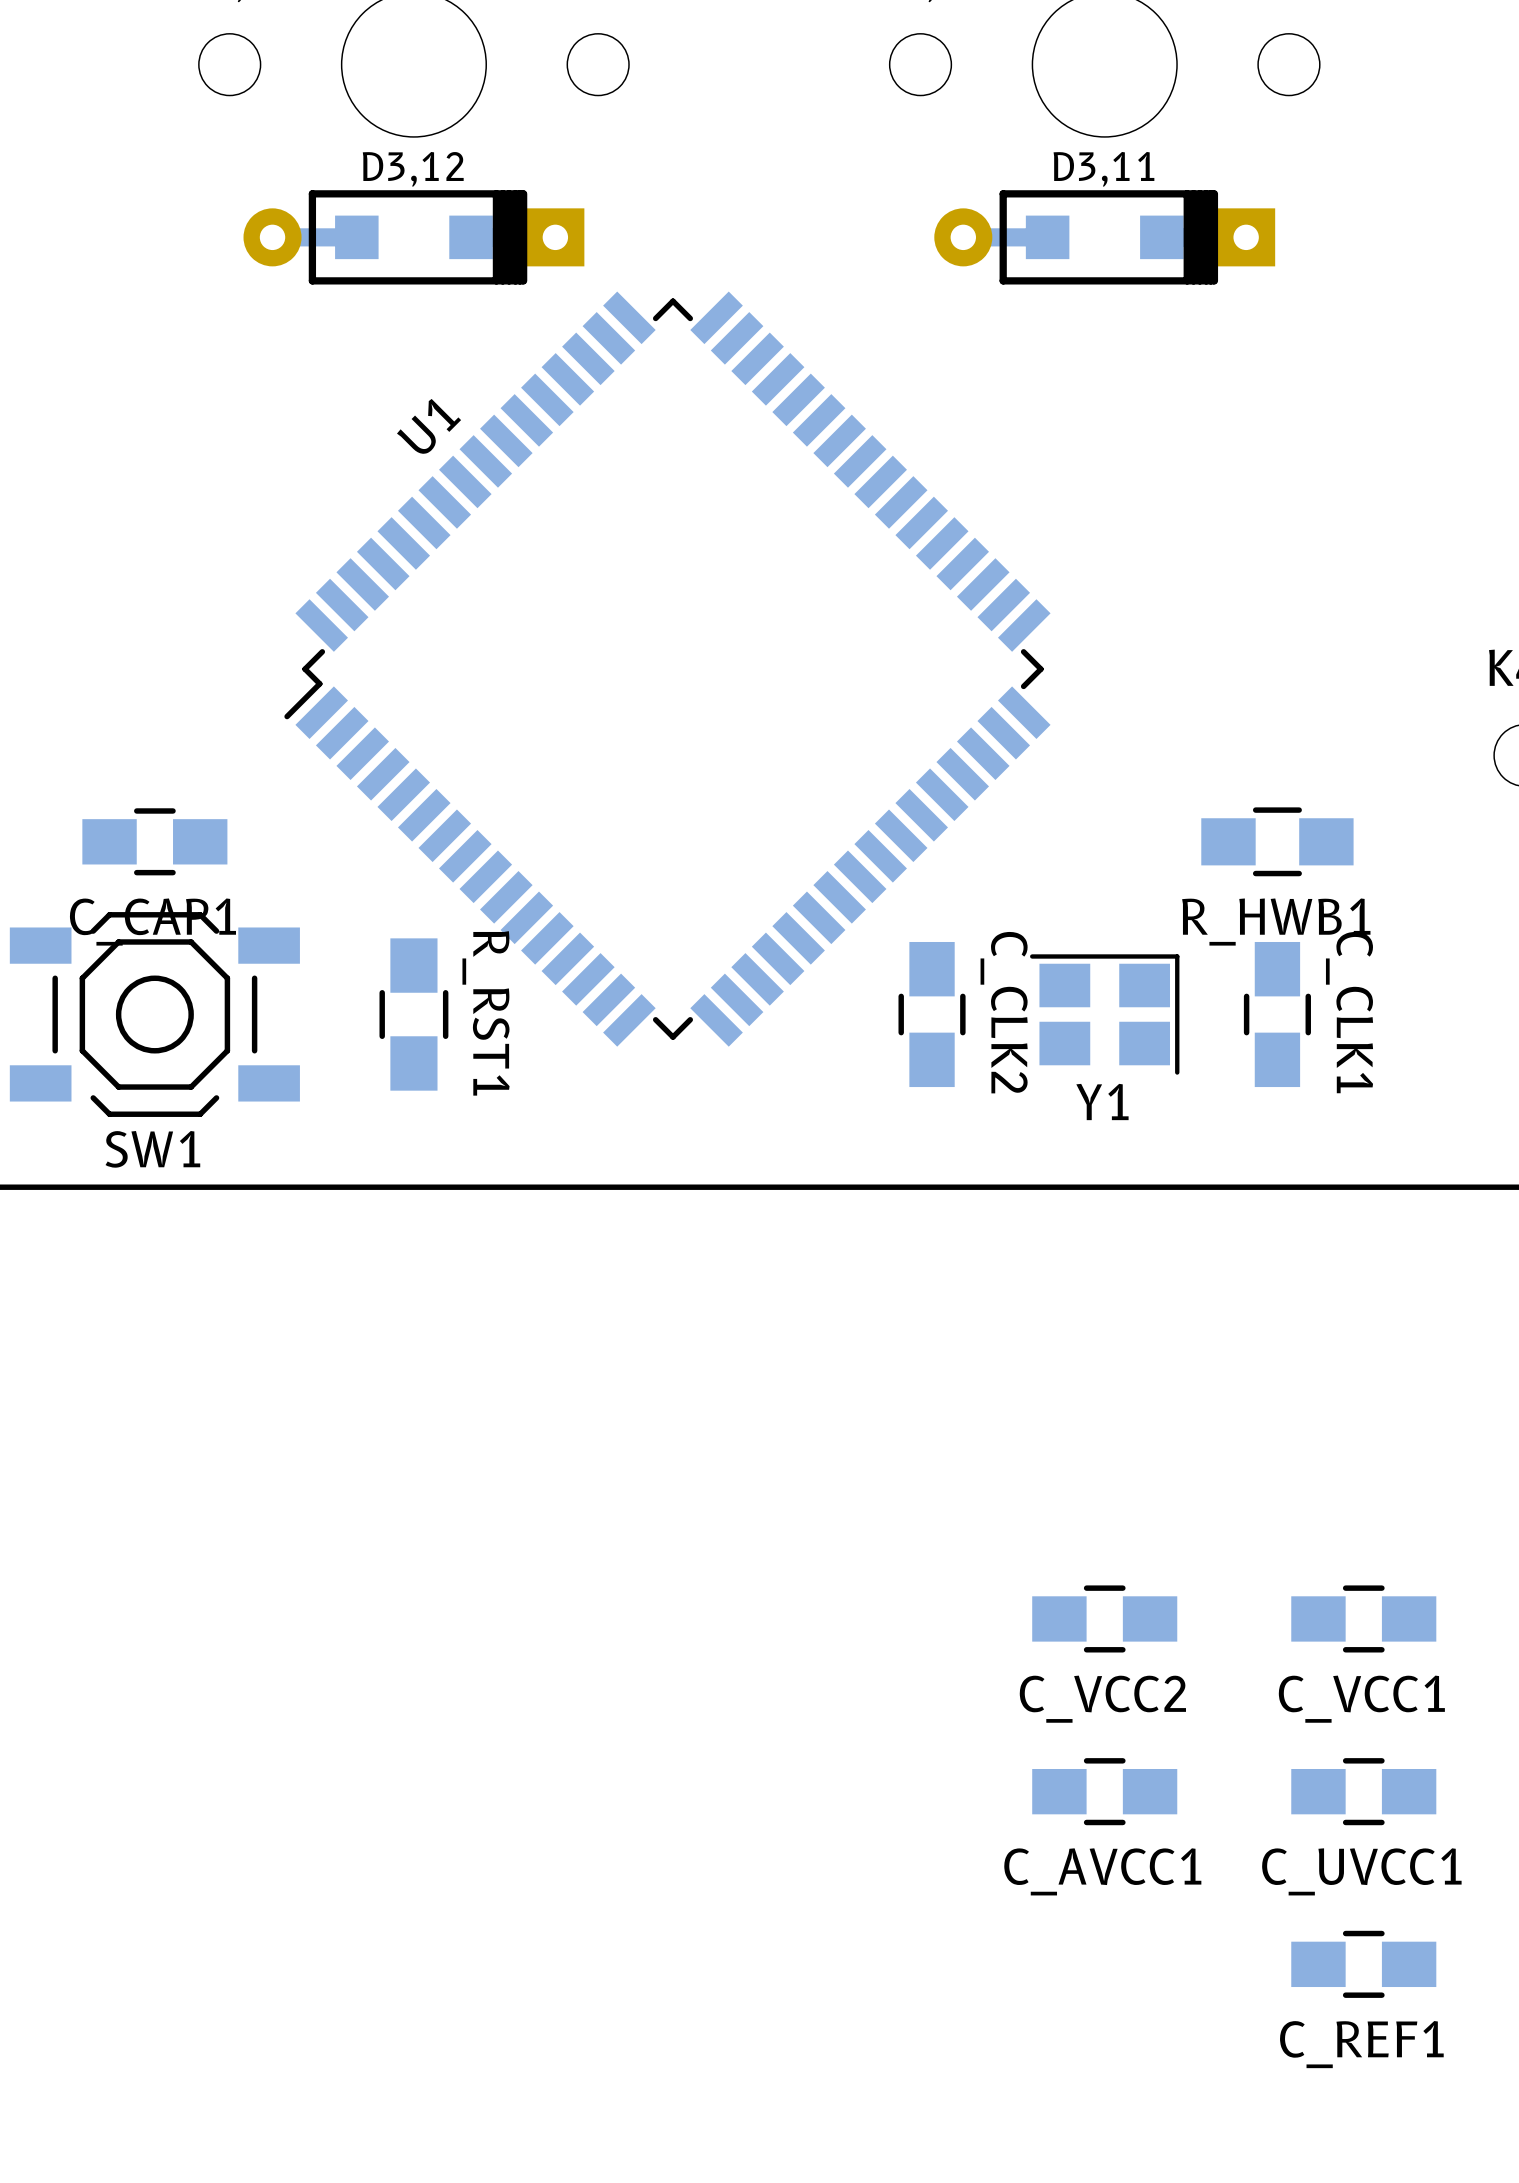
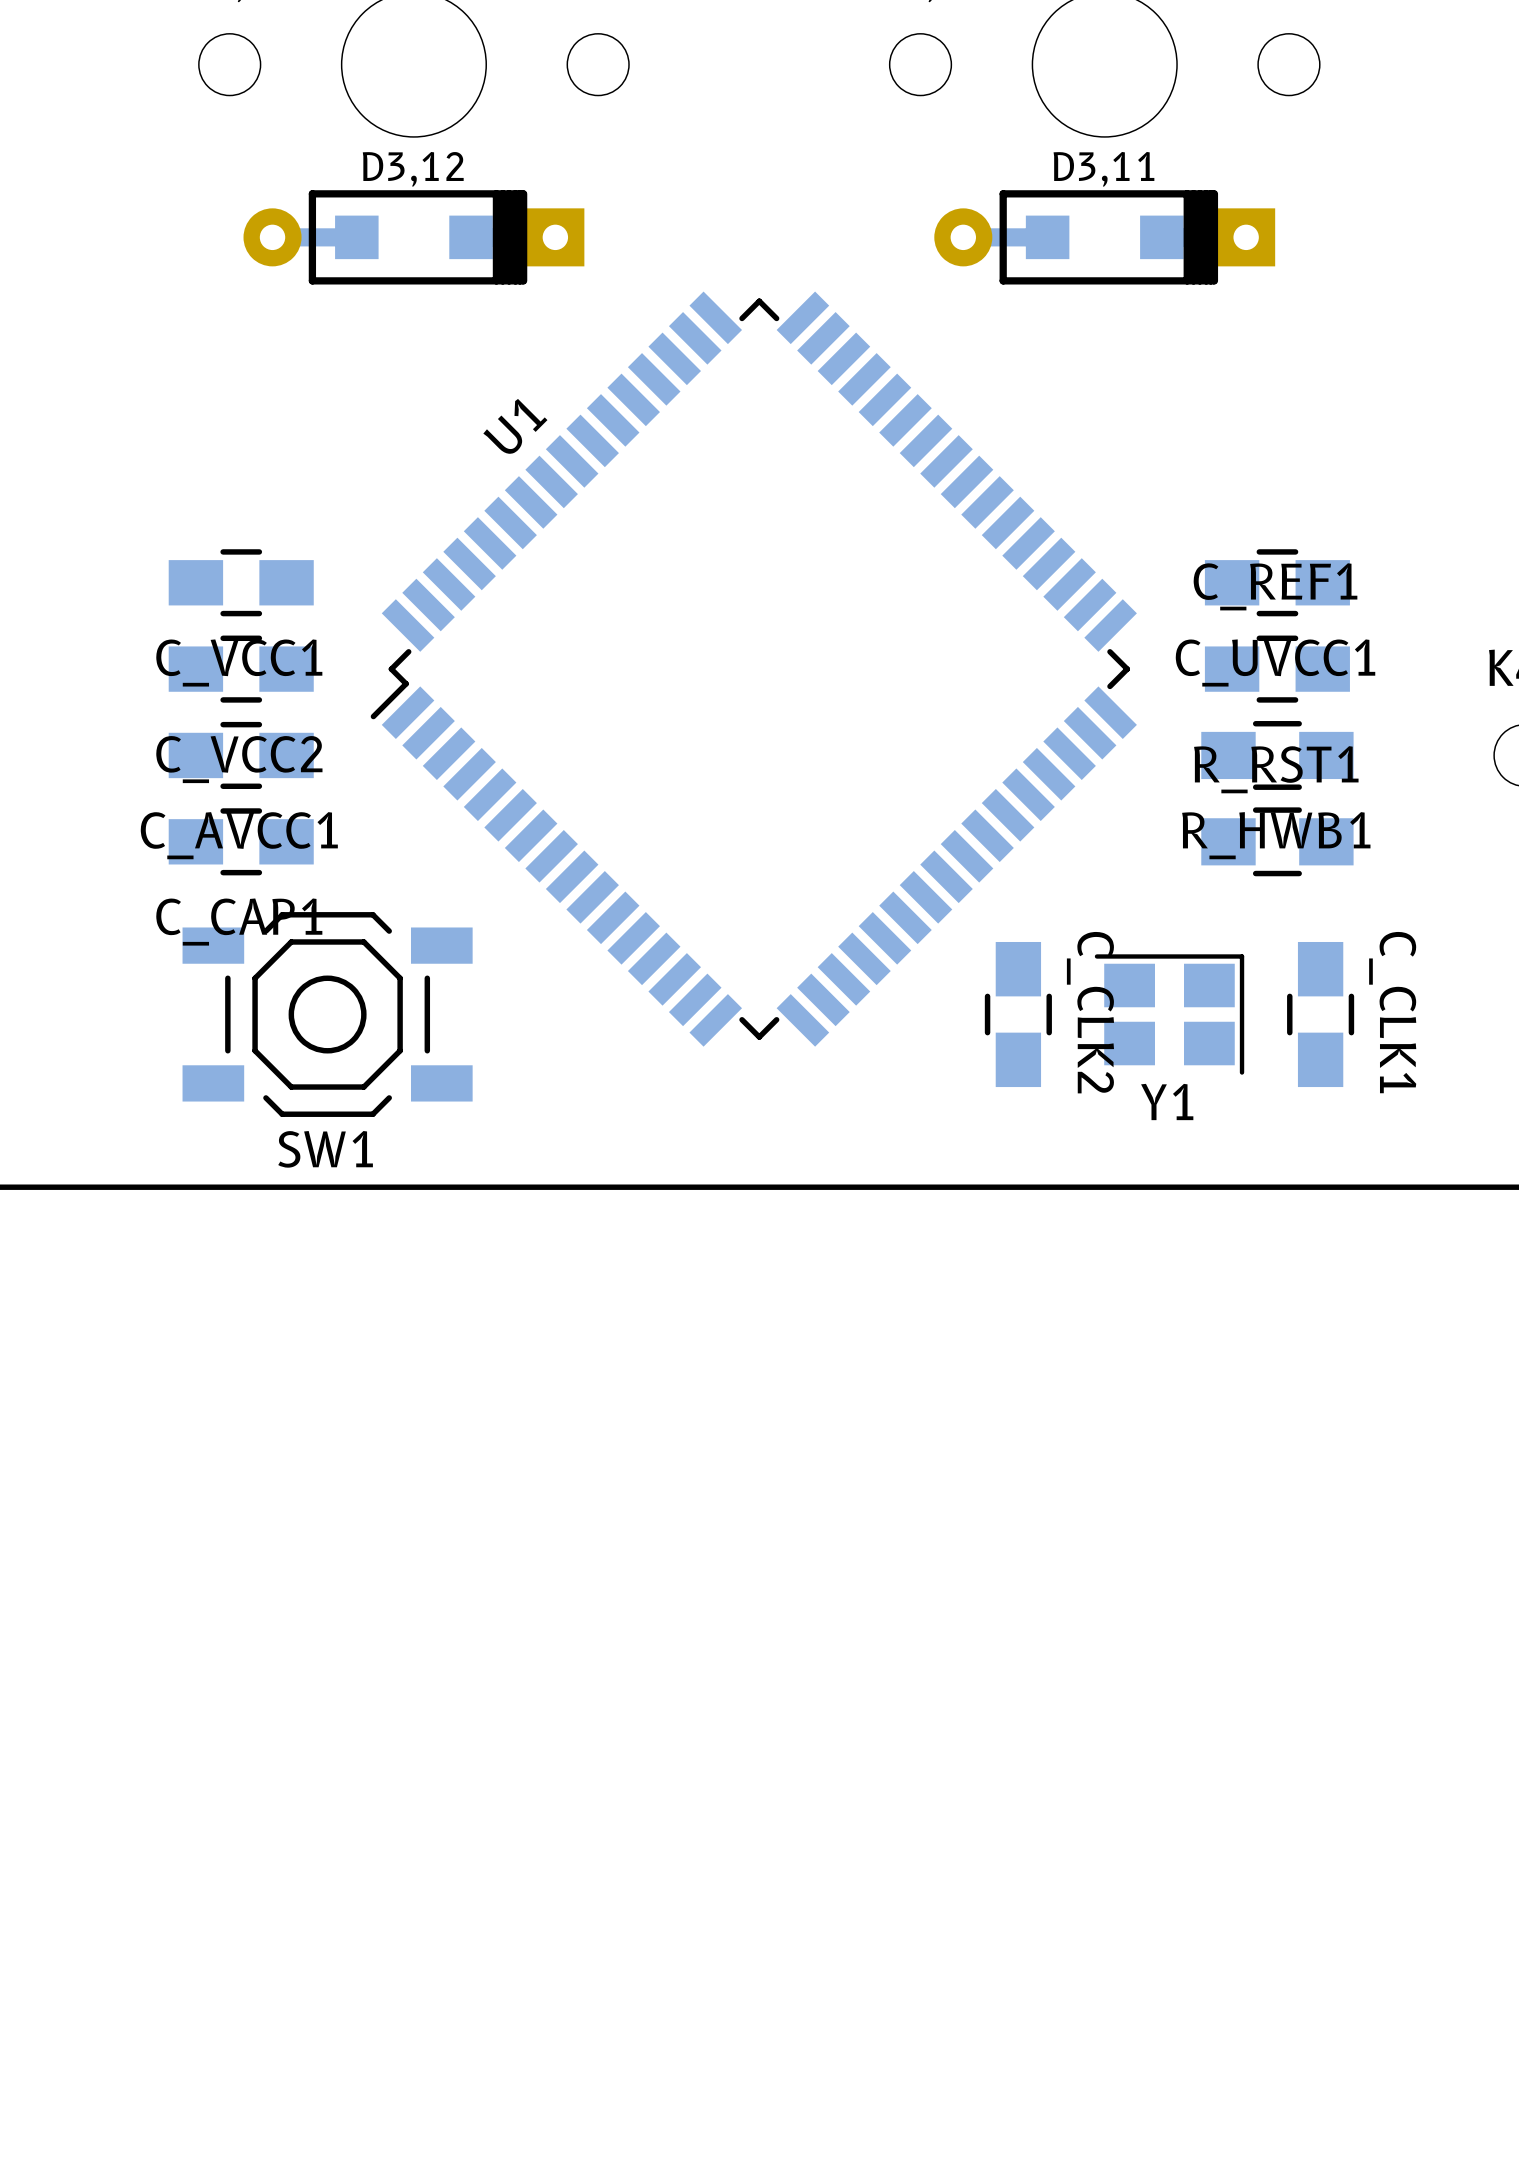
U1 position: (667, 669) -> (753, 669)
R_HWB1: none -> (1277, 755)
C_CAP1 position: (154, 841) -> (241, 841)
R_HWB1 name: R_HWB1 (1276, 922) -> R_RST1 (1276, 769)
SW1 position: (154, 1014) -> (327, 1014)
R_RST1: (413, 1014) -> none
C_CLK2 position: (932, 1014) -> (1018, 1014)
Y1 position: (1104, 1014) -> (1169, 1014)
C_CLK1 position: (1277, 1014) -> (1320, 1014)
C_VCC2 position: (1104, 1618) -> (241, 669)
C_VCC1 position: (1363, 1618) -> (241, 582)
C_VCC2 name position: C_VCC2 (1102, 1699) -> C_VCC2 (239, 759)
C_AVCC1 position: (1104, 1791) -> (241, 755)
C_UVCC1 position: (1363, 1791) -> (1277, 582)
C_REF1 position: (1363, 1964) -> (1277, 669)
C_REF1 name position: C_REF1 (1361, 2044) -> C_REF1 (1275, 586)

